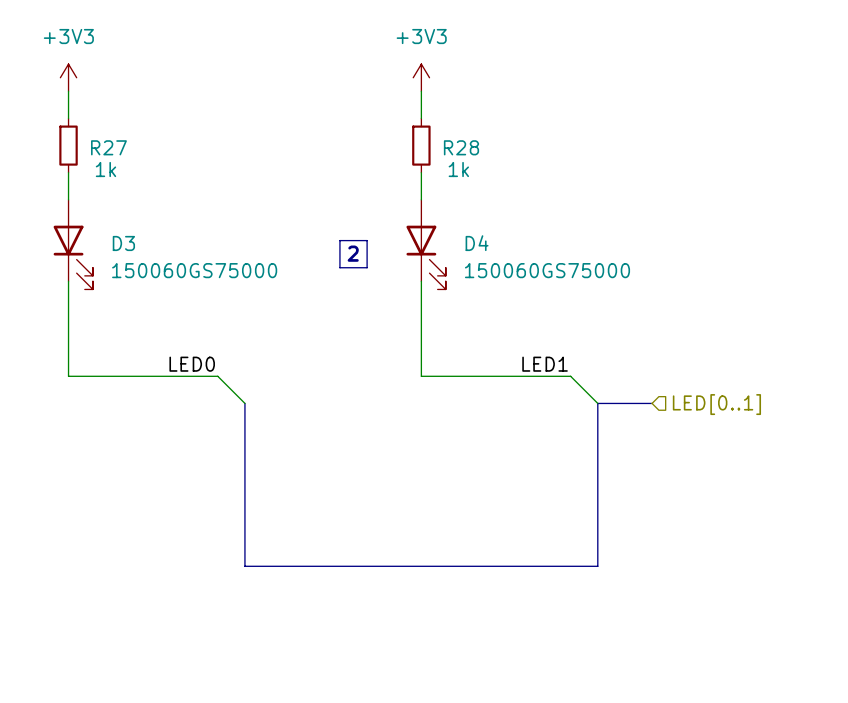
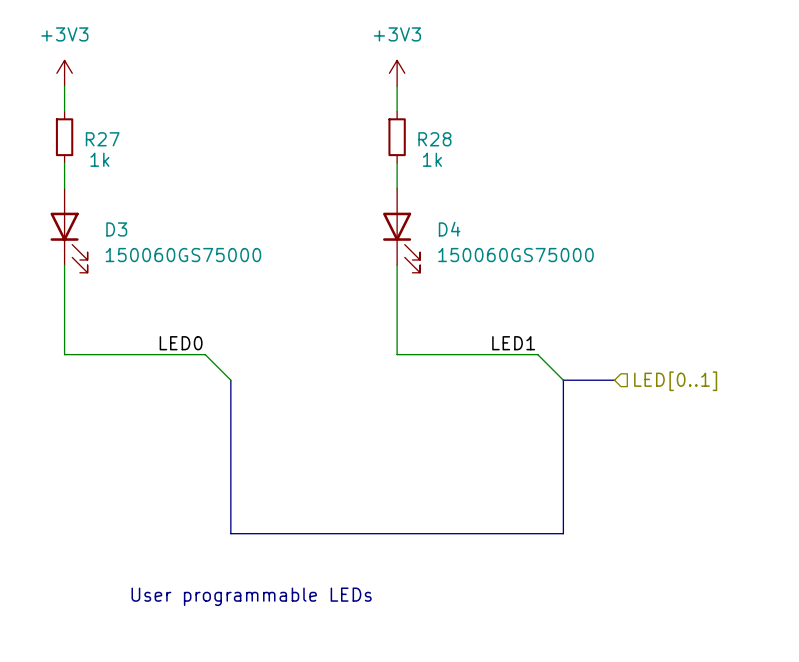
line: (339, 240) (367, 240) (367, 267) (339, 267) (339, 240) -> none
text: 2 (353, 253) -> none
text: none -> User programmable LEDs (251, 596)

